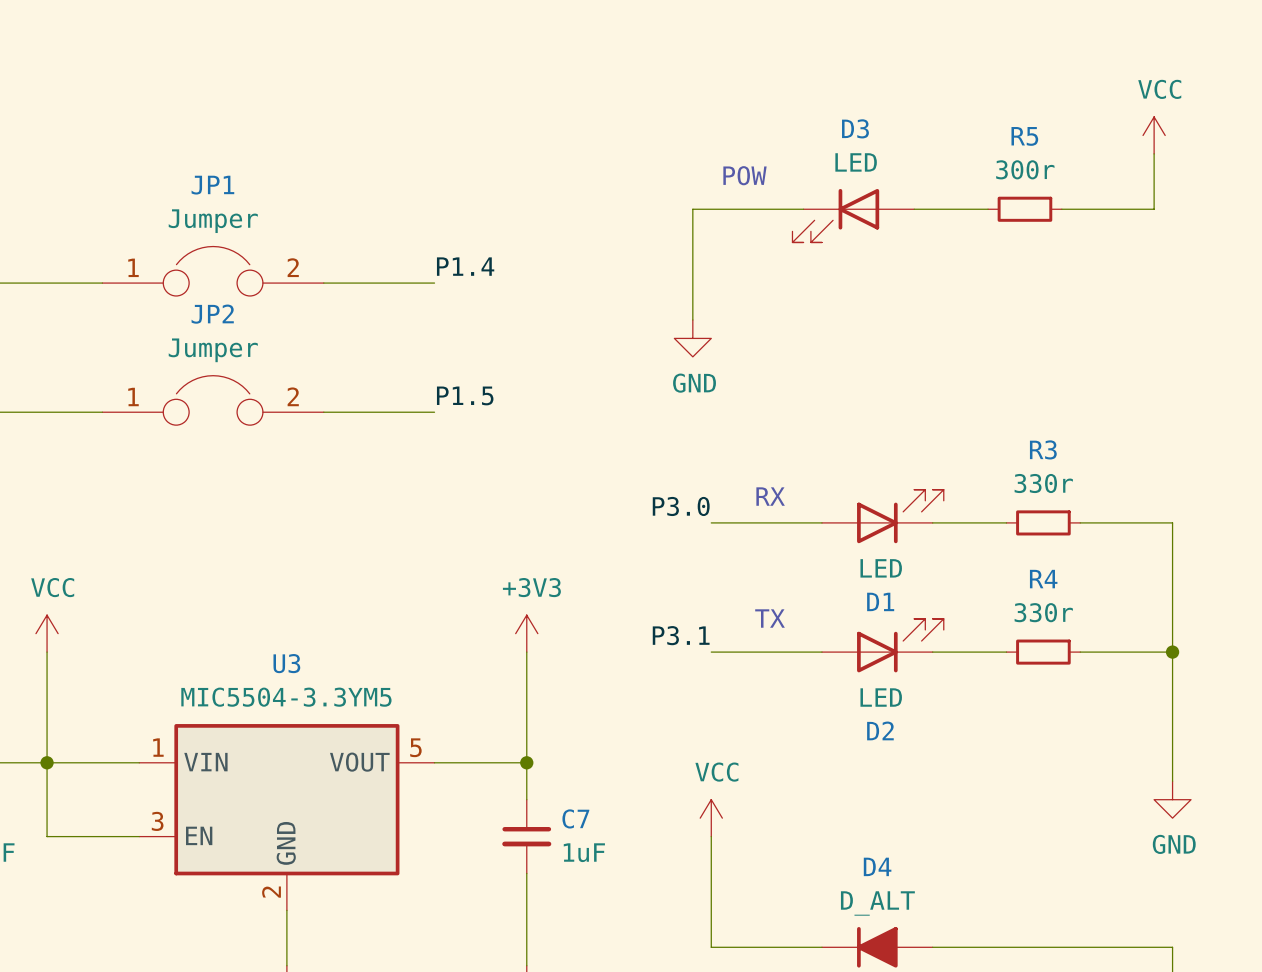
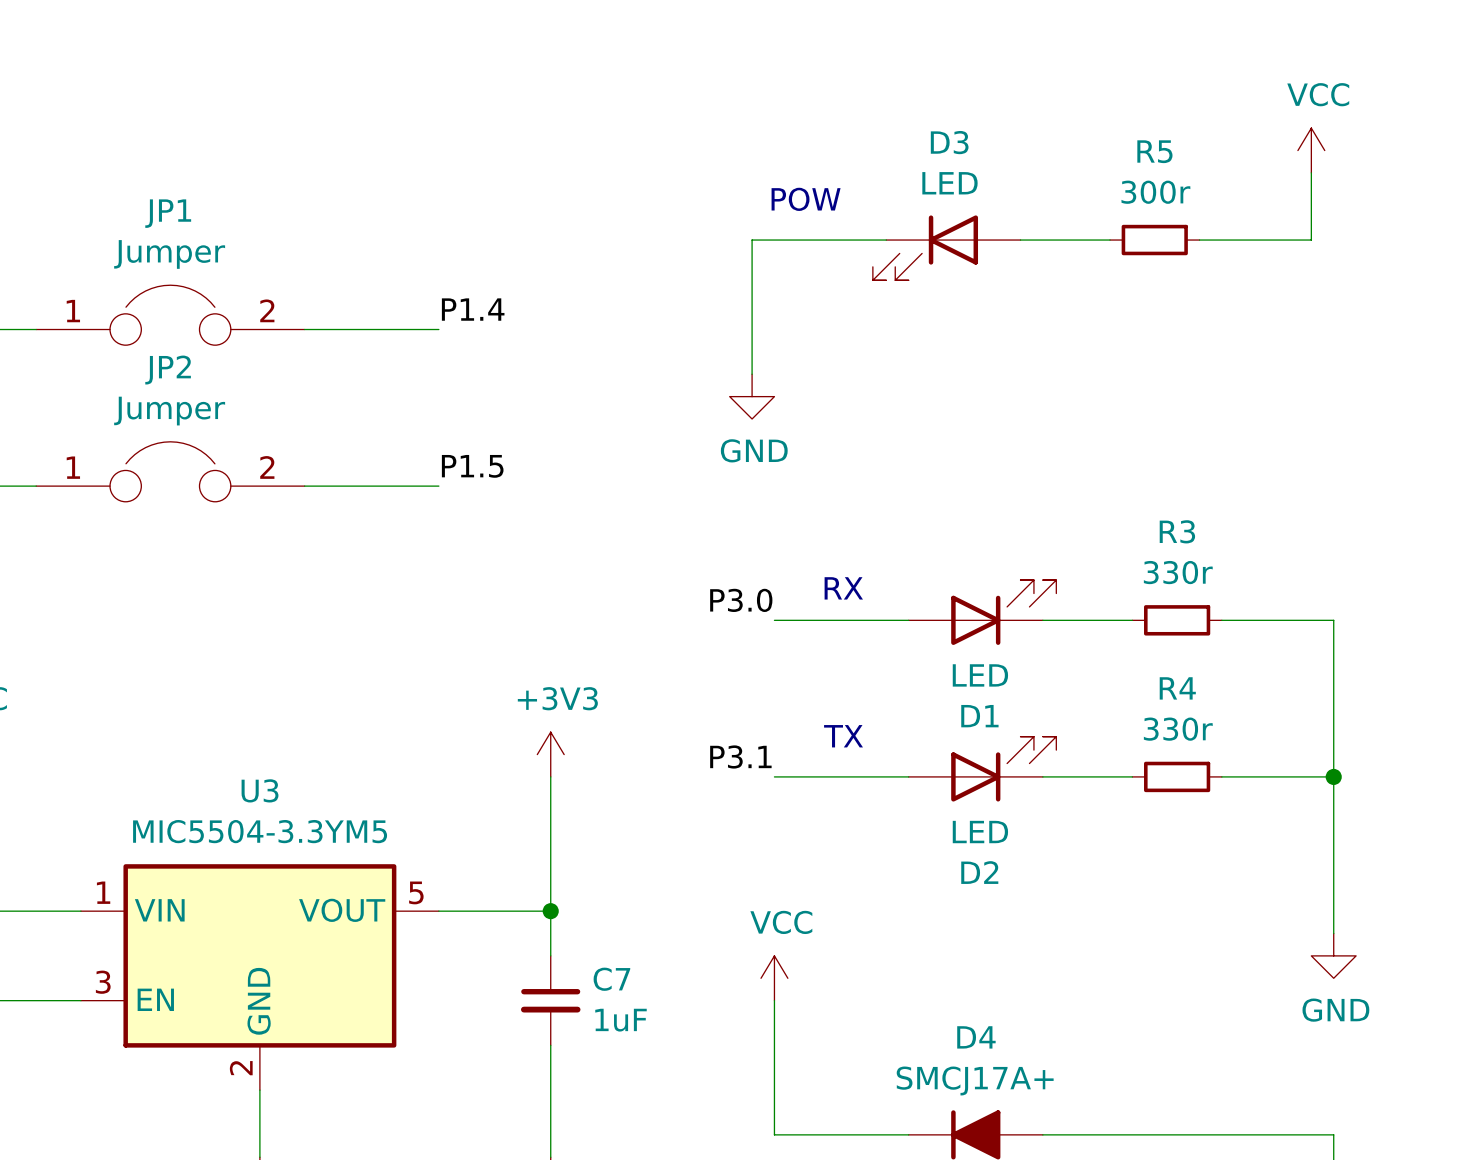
D4 value: D_ALT (877, 903) -> SMCJ17A+ (975, 1080)

